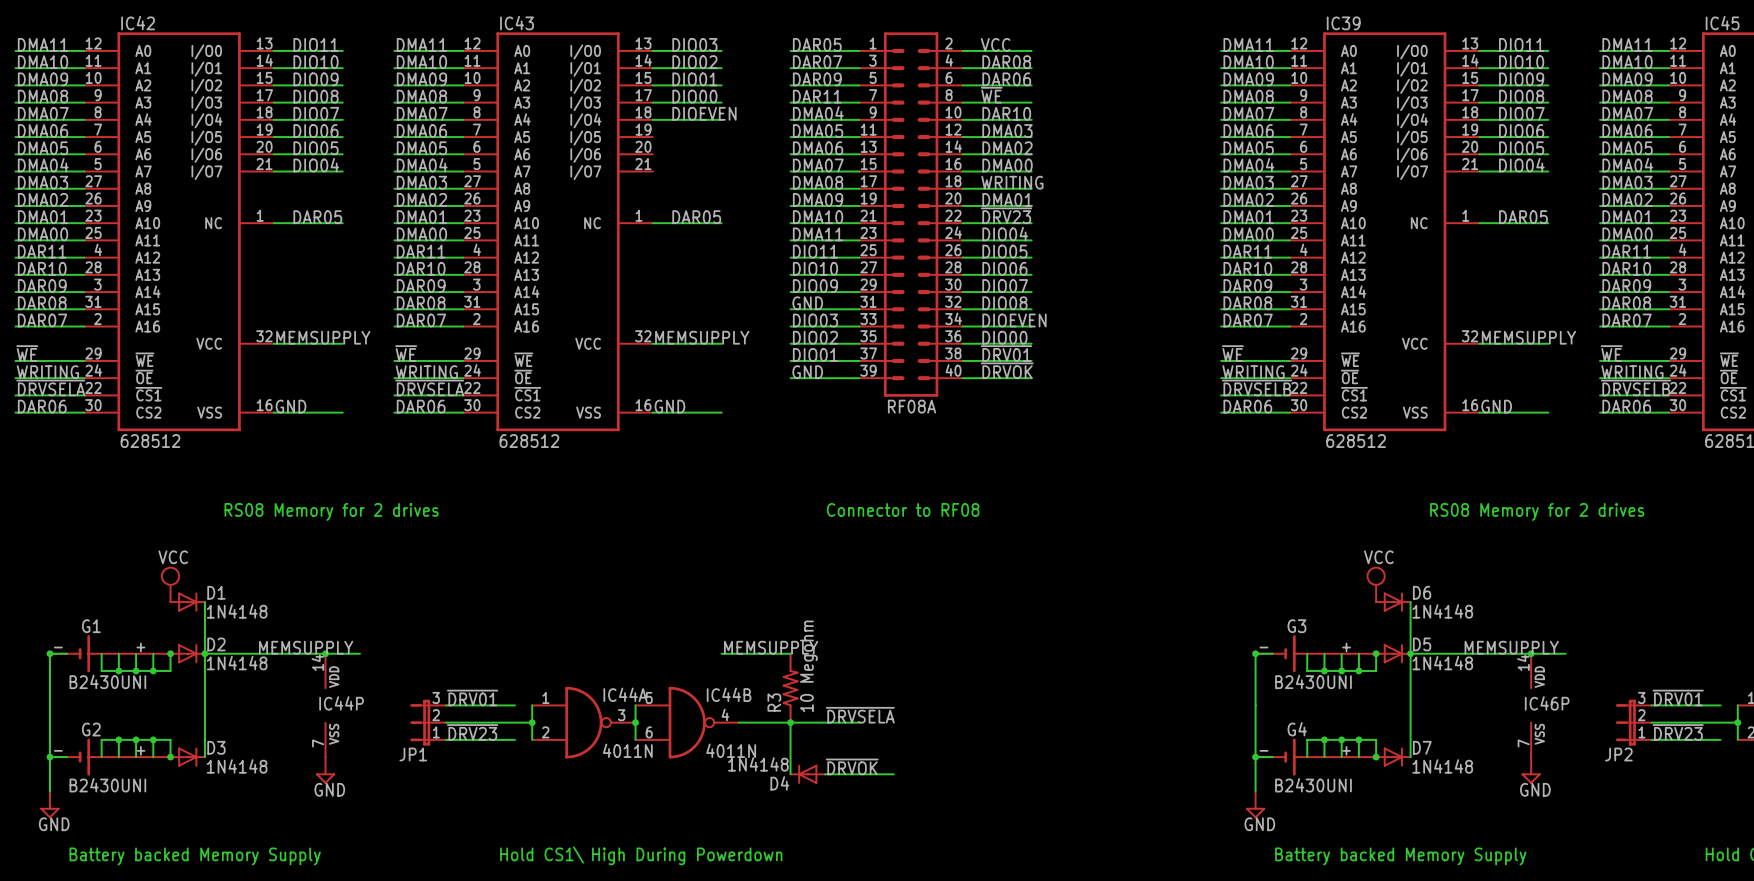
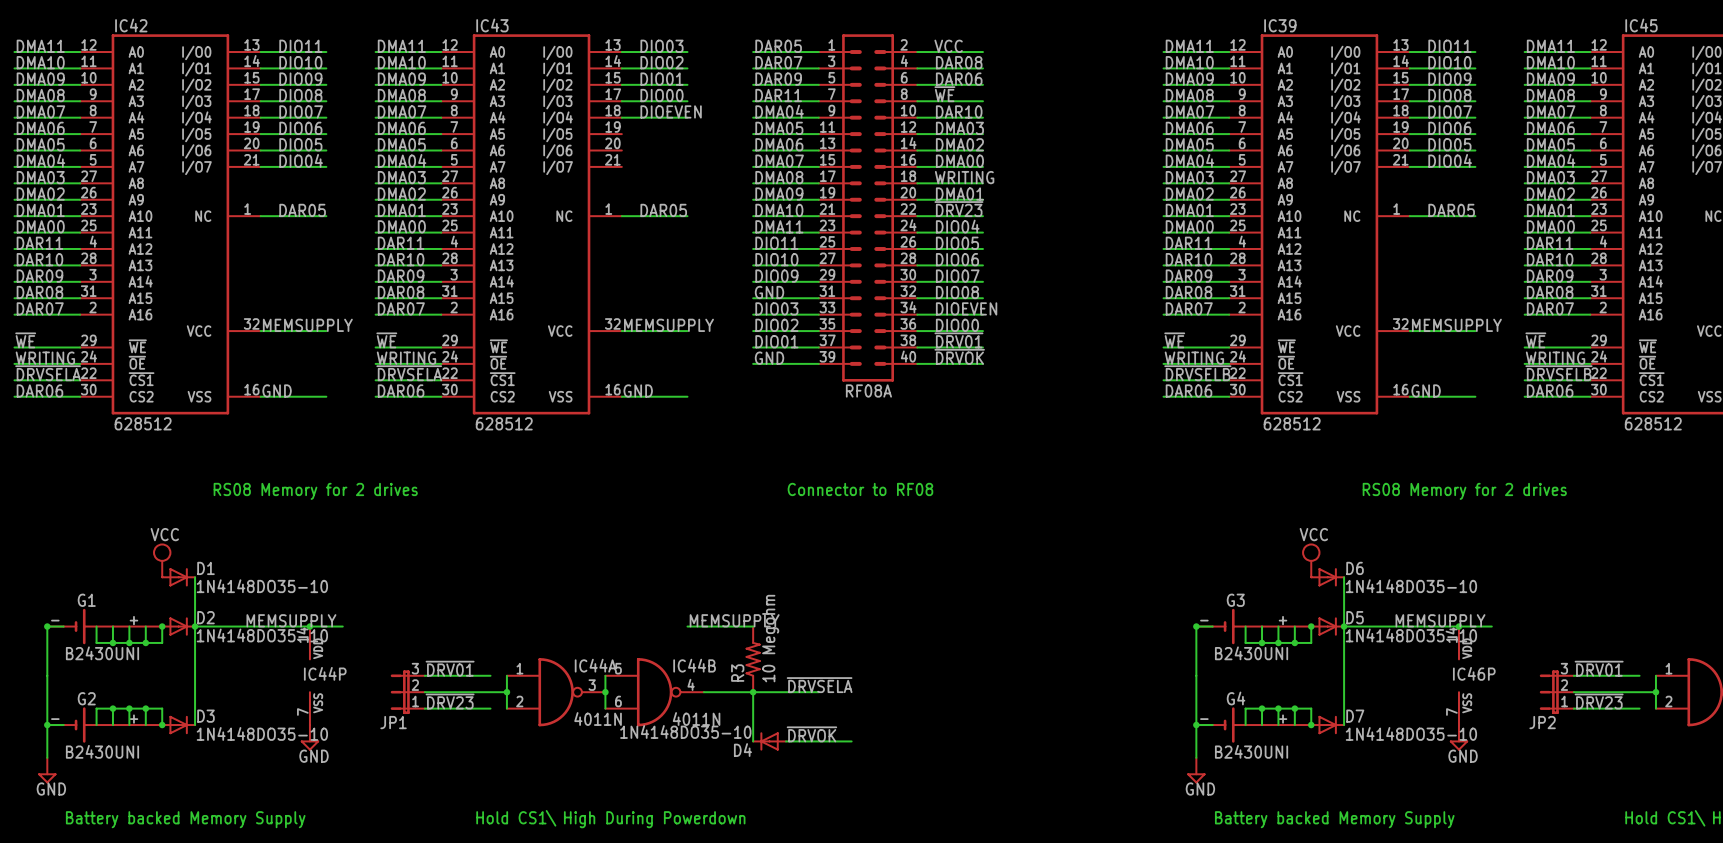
D1 value: 1N4148 (237, 611) -> 1N4148DO35-10 (262, 586)
D6 value: 1N4148 (1442, 611) -> 1N4148DO35-10 (1411, 586)
D2 value: 1N4148 (237, 663) -> 1N4148DO35-10 (262, 635)
D5 value: 1N4148 (1442, 663) -> 1N4148DO35-10 (1411, 635)
D4 value: 1N4148 (758, 764) -> 1N4148DO35-10 (685, 731)
D3 value: 1N4148 (237, 766) -> 1N4148DO35-10 (262, 733)
D7 value: 1N4148 (1442, 766) -> 1N4148DO35-10 (1411, 733)

